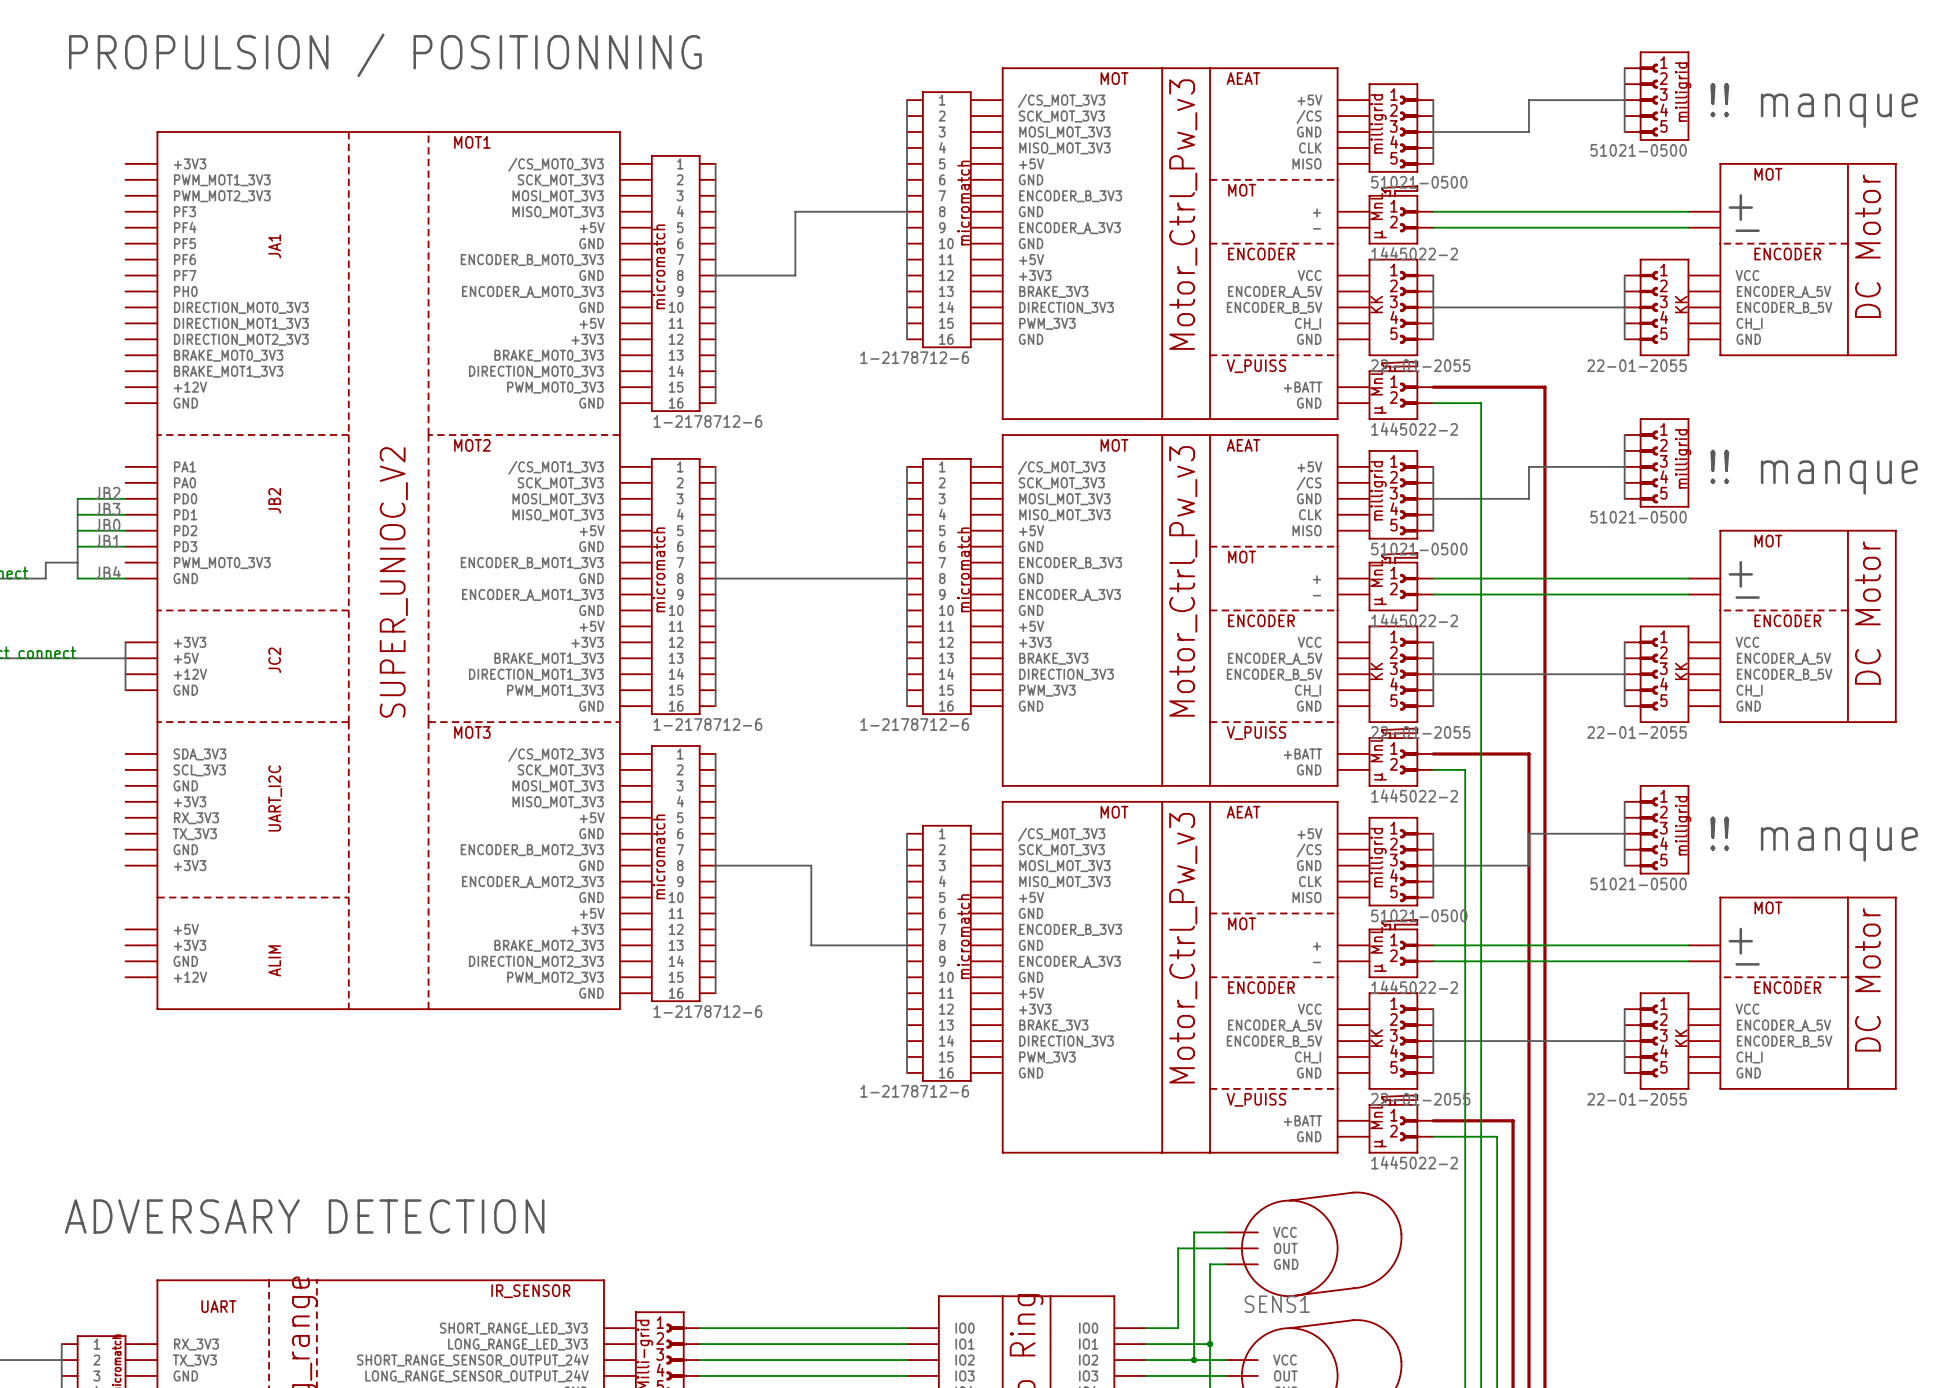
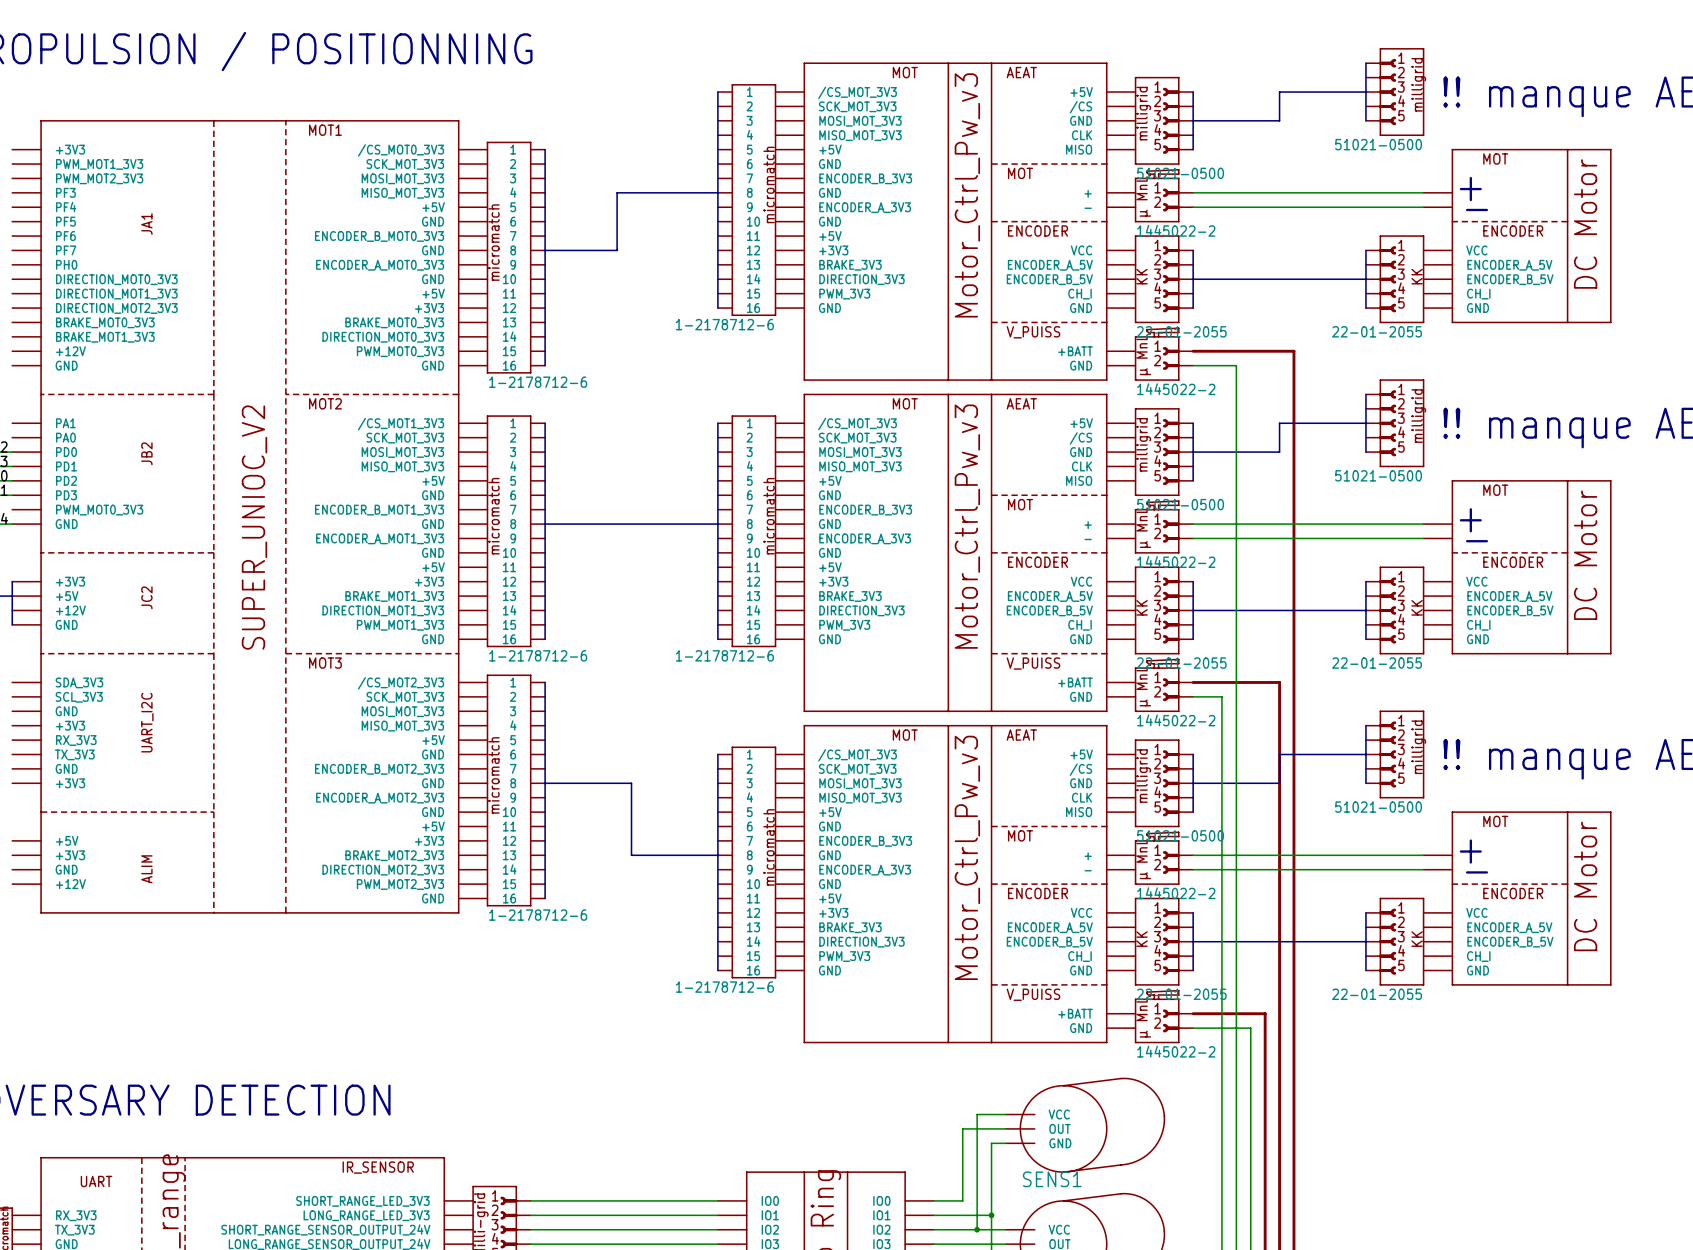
part symbol: [1639, 51, 1690, 141] -> [1378, 48, 1425, 136]
part symbol: [1368, 83, 1419, 173] -> [1134, 76, 1181, 165]
part symbol: [1639, 418, 1690, 508] -> [1378, 379, 1425, 468]
part symbol: [1368, 450, 1419, 540] -> [1134, 408, 1181, 496]
part symbol: [1639, 785, 1690, 875] -> [1378, 710, 1425, 799]
part symbol: [1368, 816, 1419, 907] -> [1134, 739, 1181, 828]

